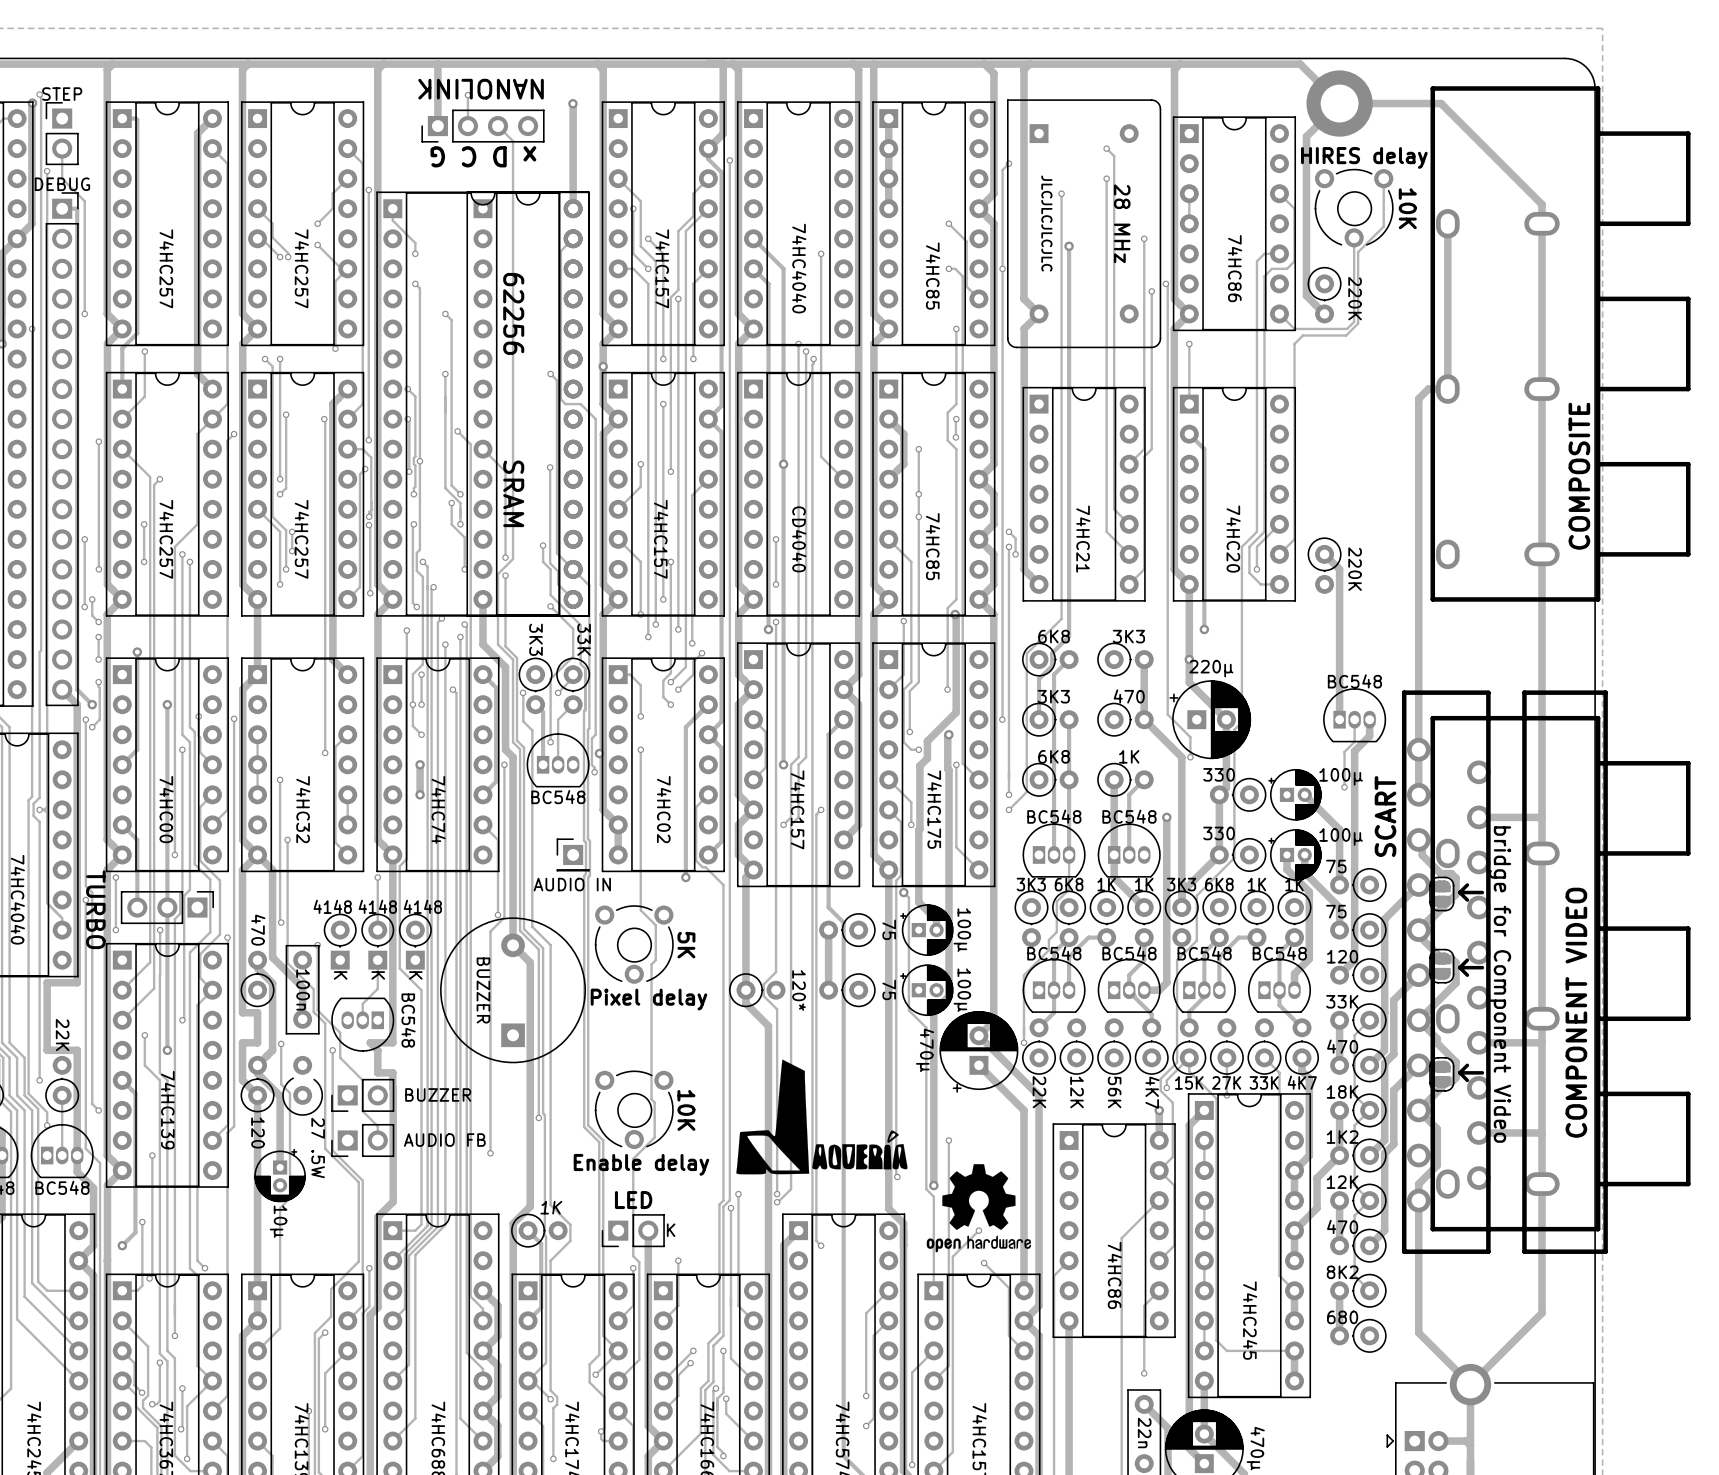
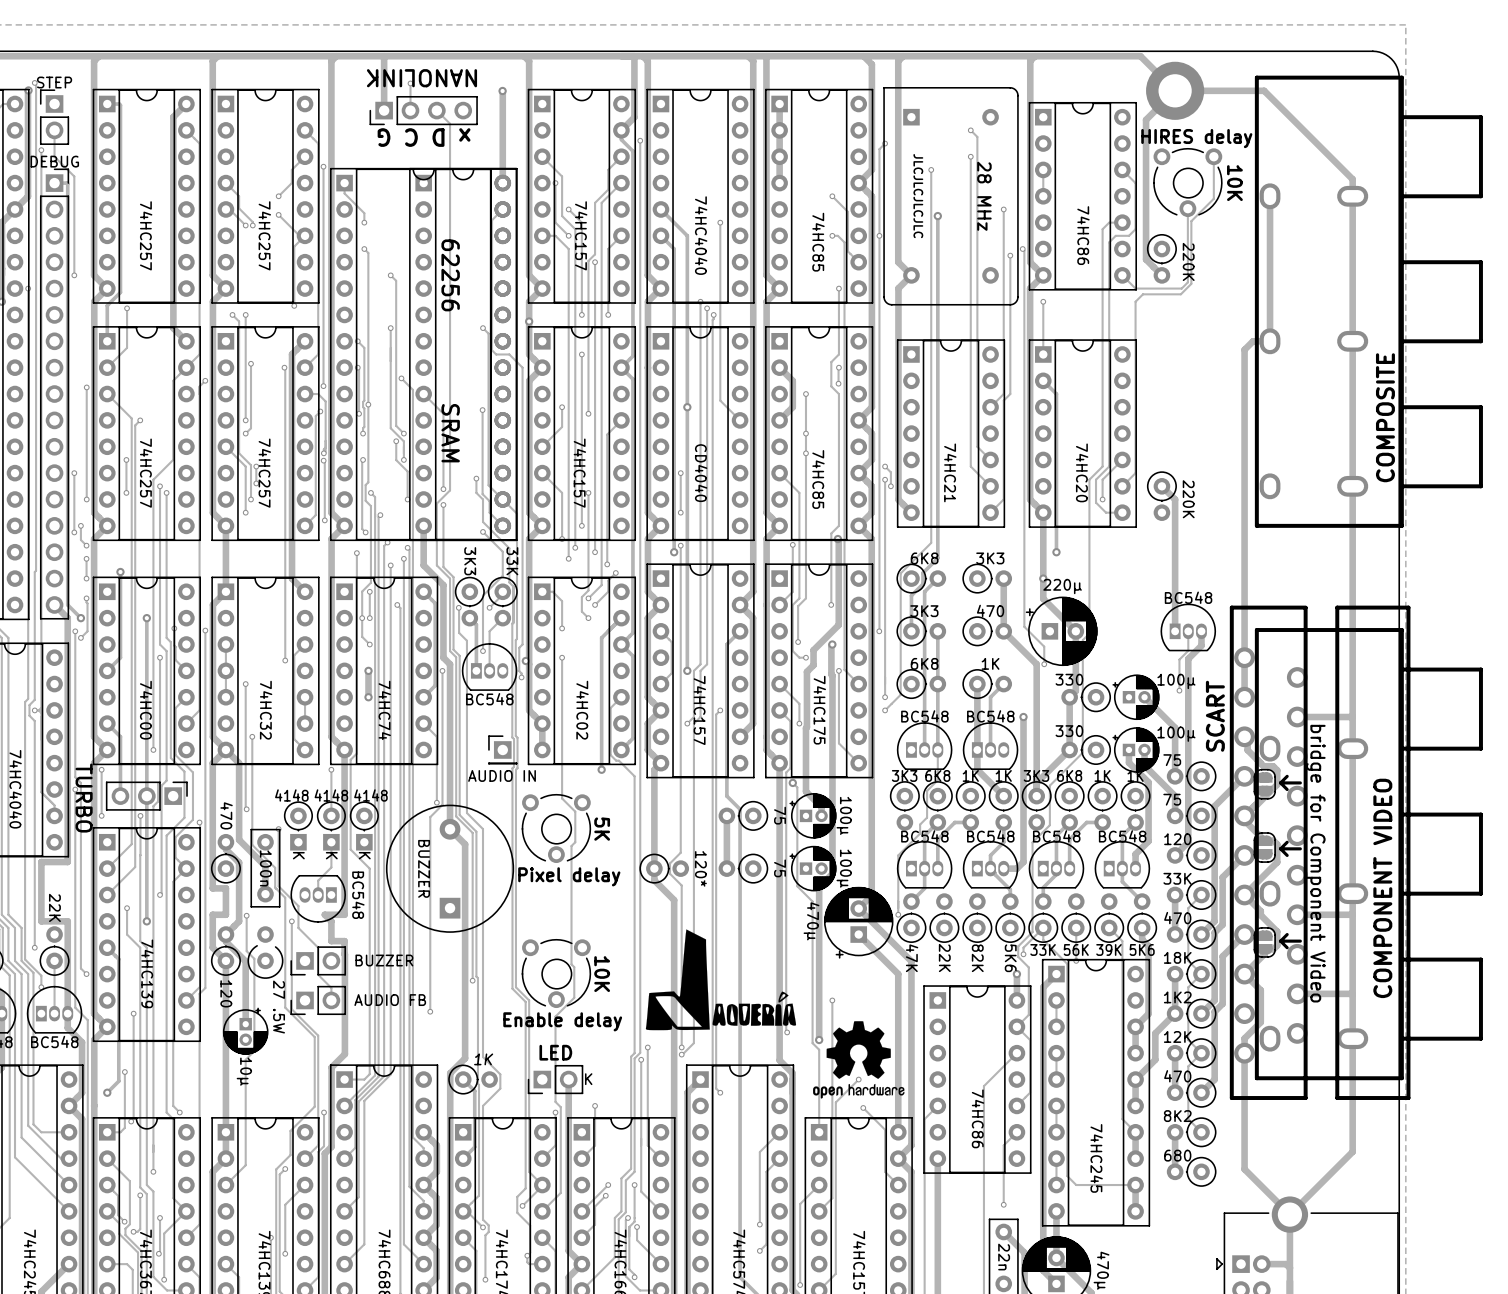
part value: 15K (1189, 1082) -> 33K (1043, 949)
part value: 27K (1226, 1082) -> 56K (1076, 949)
part value: 33K (1264, 1082) -> 39K (1108, 949)
part value: 4K7 (1302, 1082) -> 5K6 (1142, 949)
part value: 22K (1039, 1092) -> 47K (912, 958)
part value: 12K (1077, 1092) -> 22K (944, 958)
part value: 56K (1114, 1092) -> 82K (977, 958)
part value: 4K7 (1152, 1092) -> 5K6 (1010, 958)

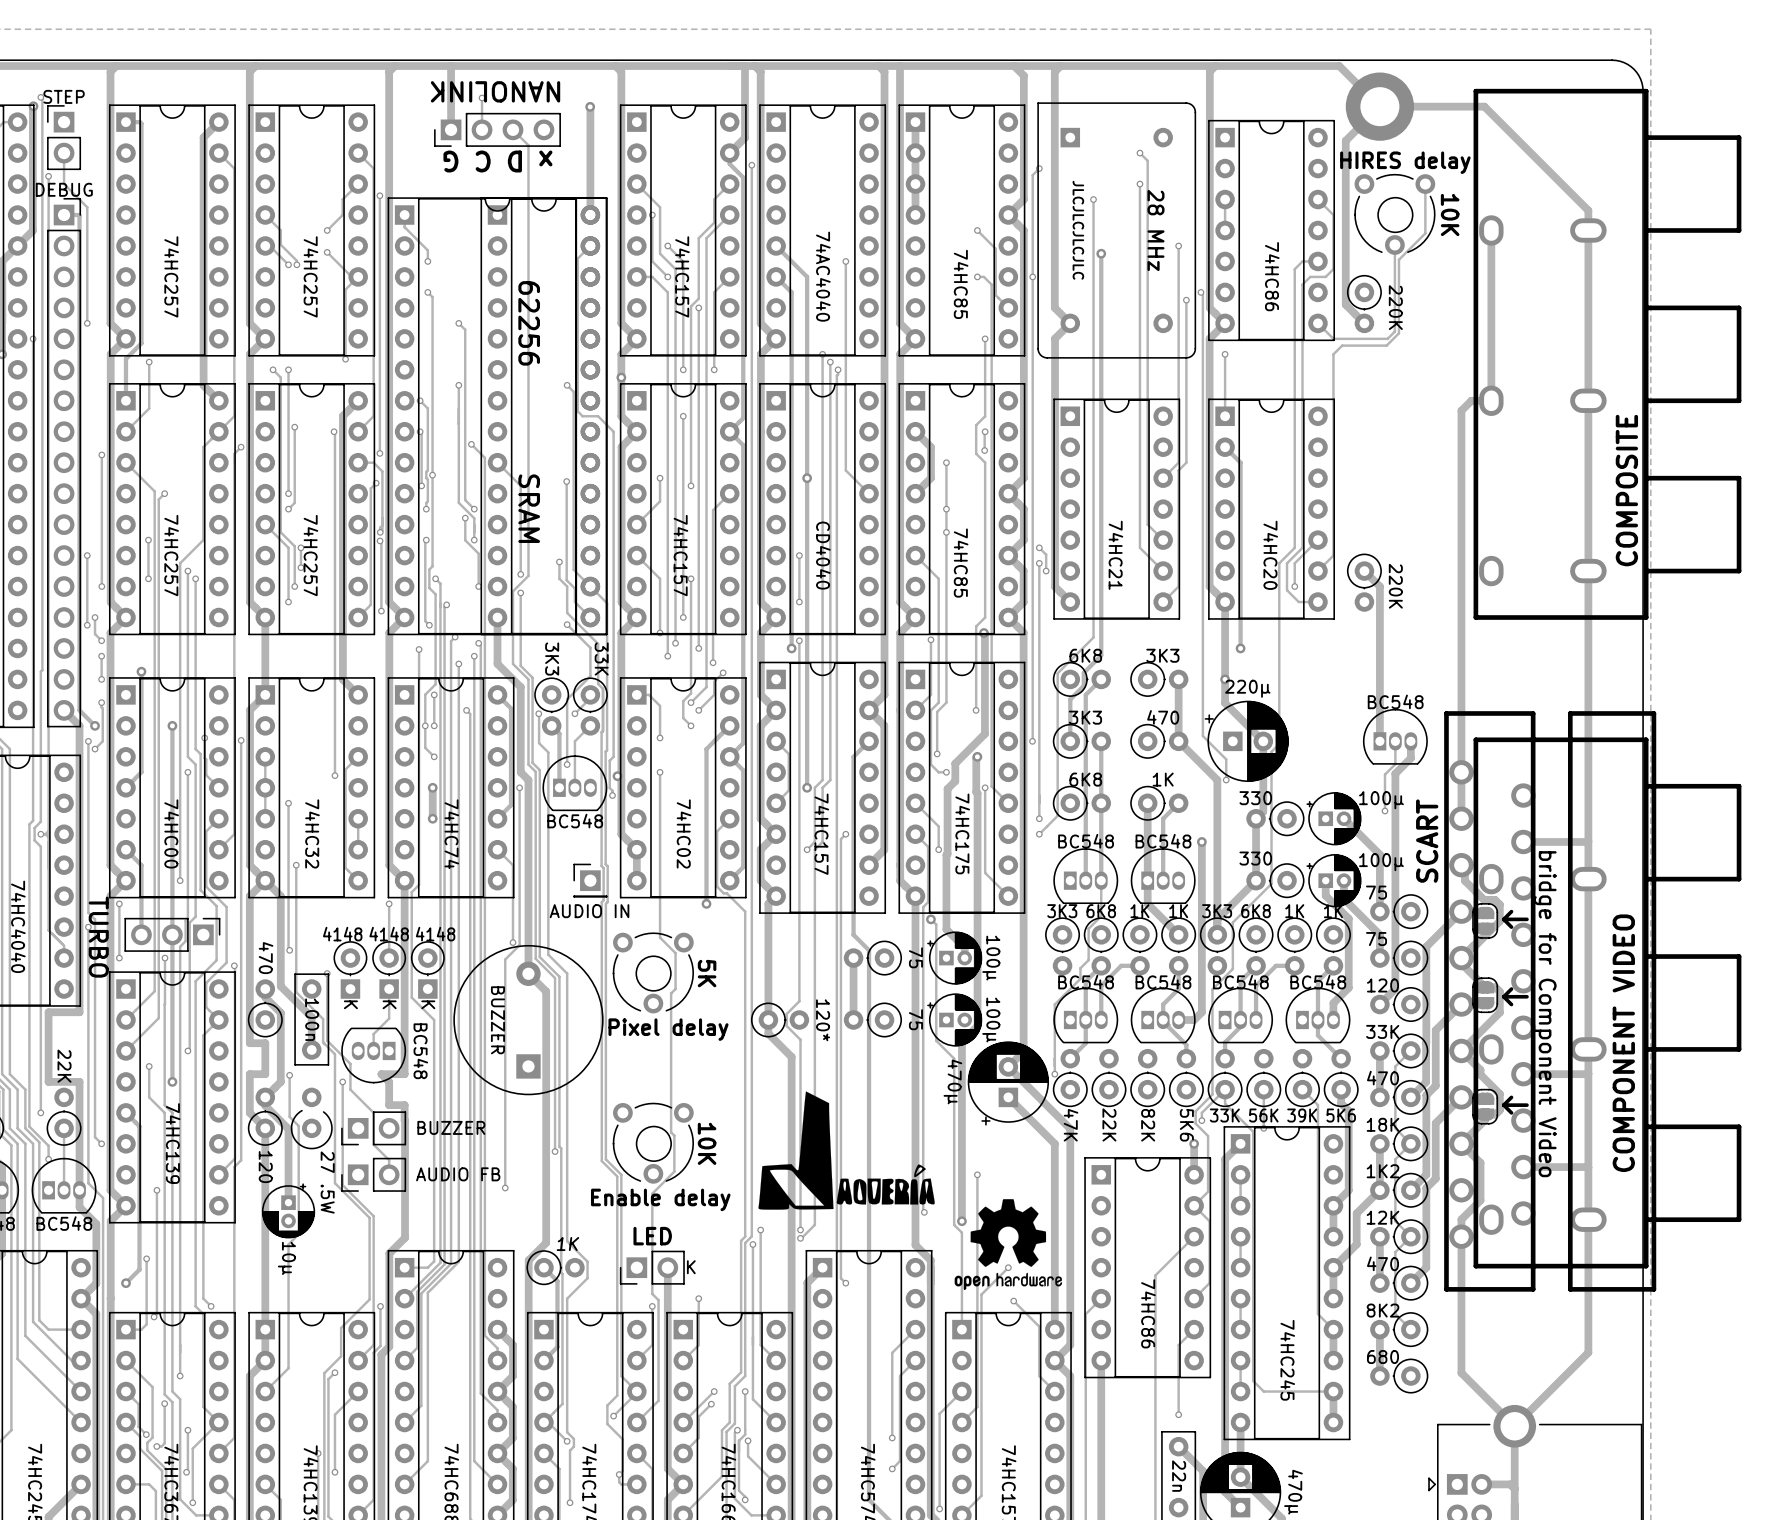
part value: 74HC4040 (701, 235) -> 74AC4040 (823, 276)

